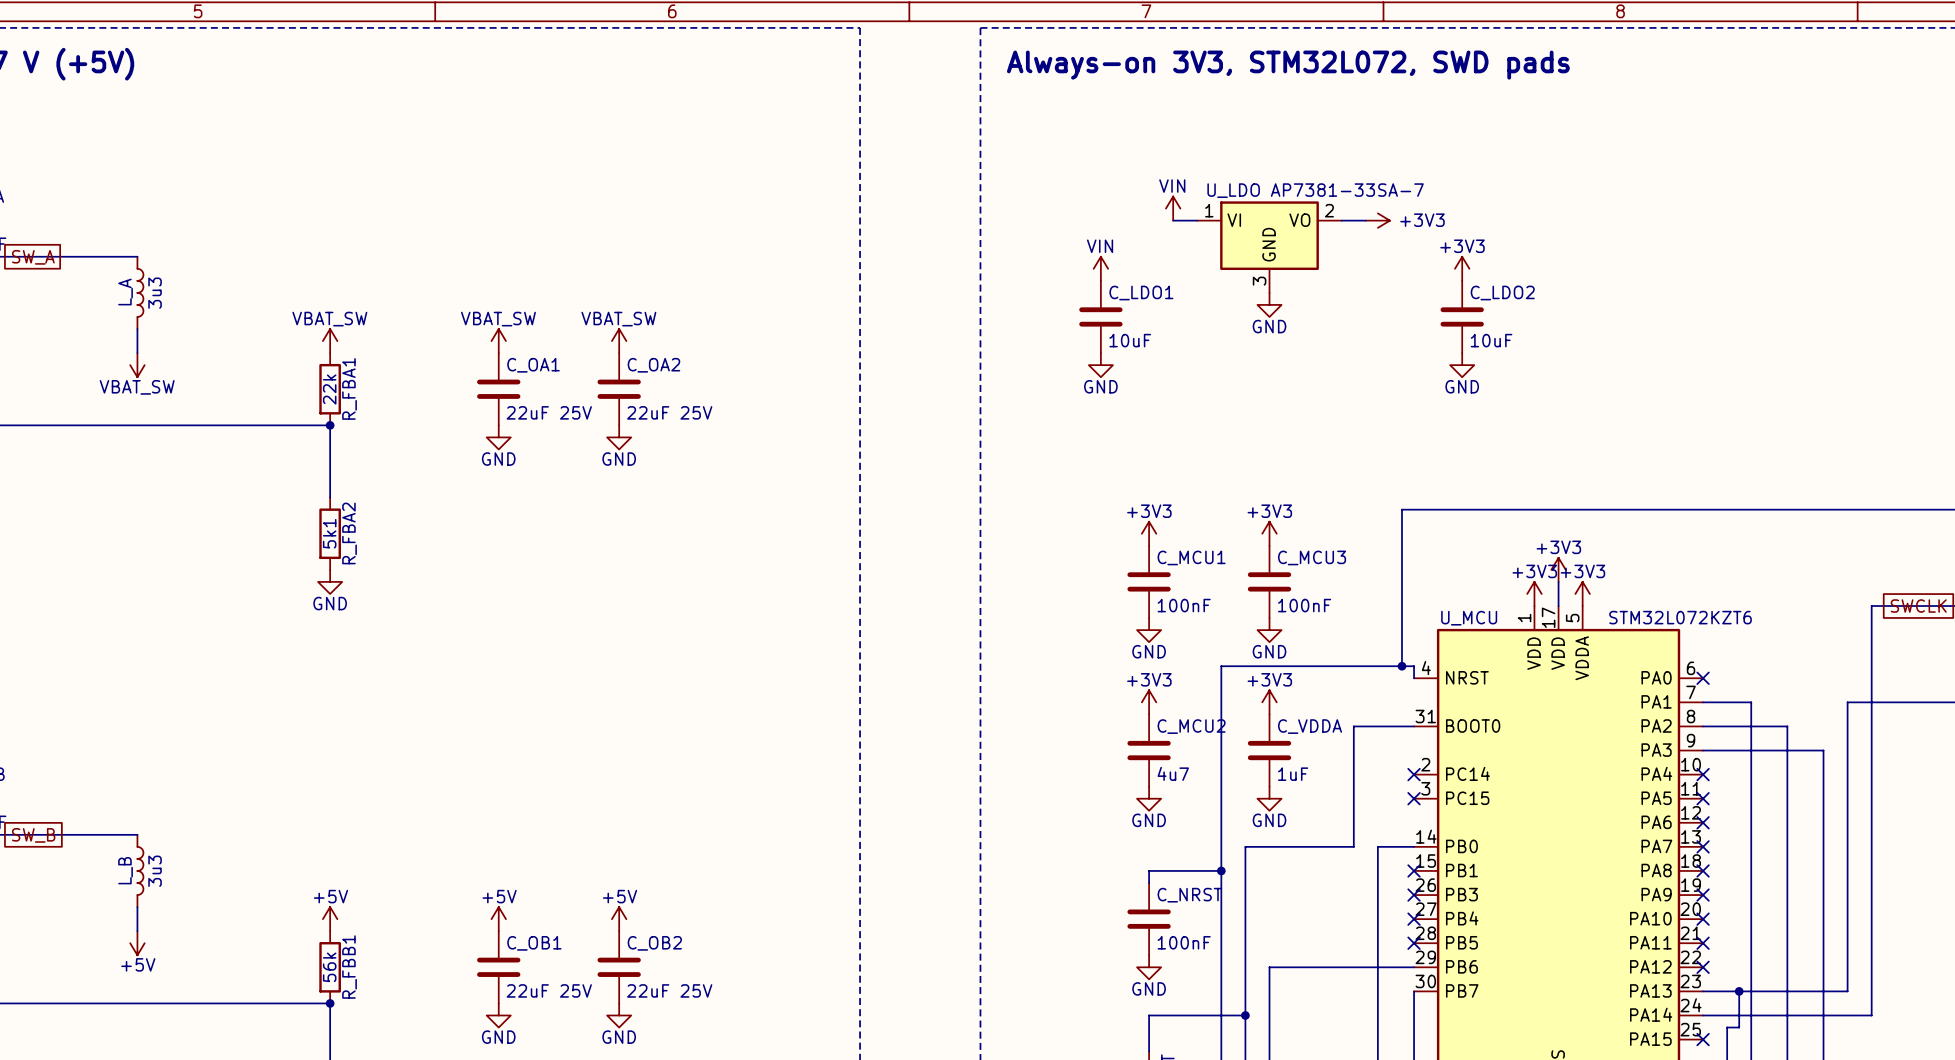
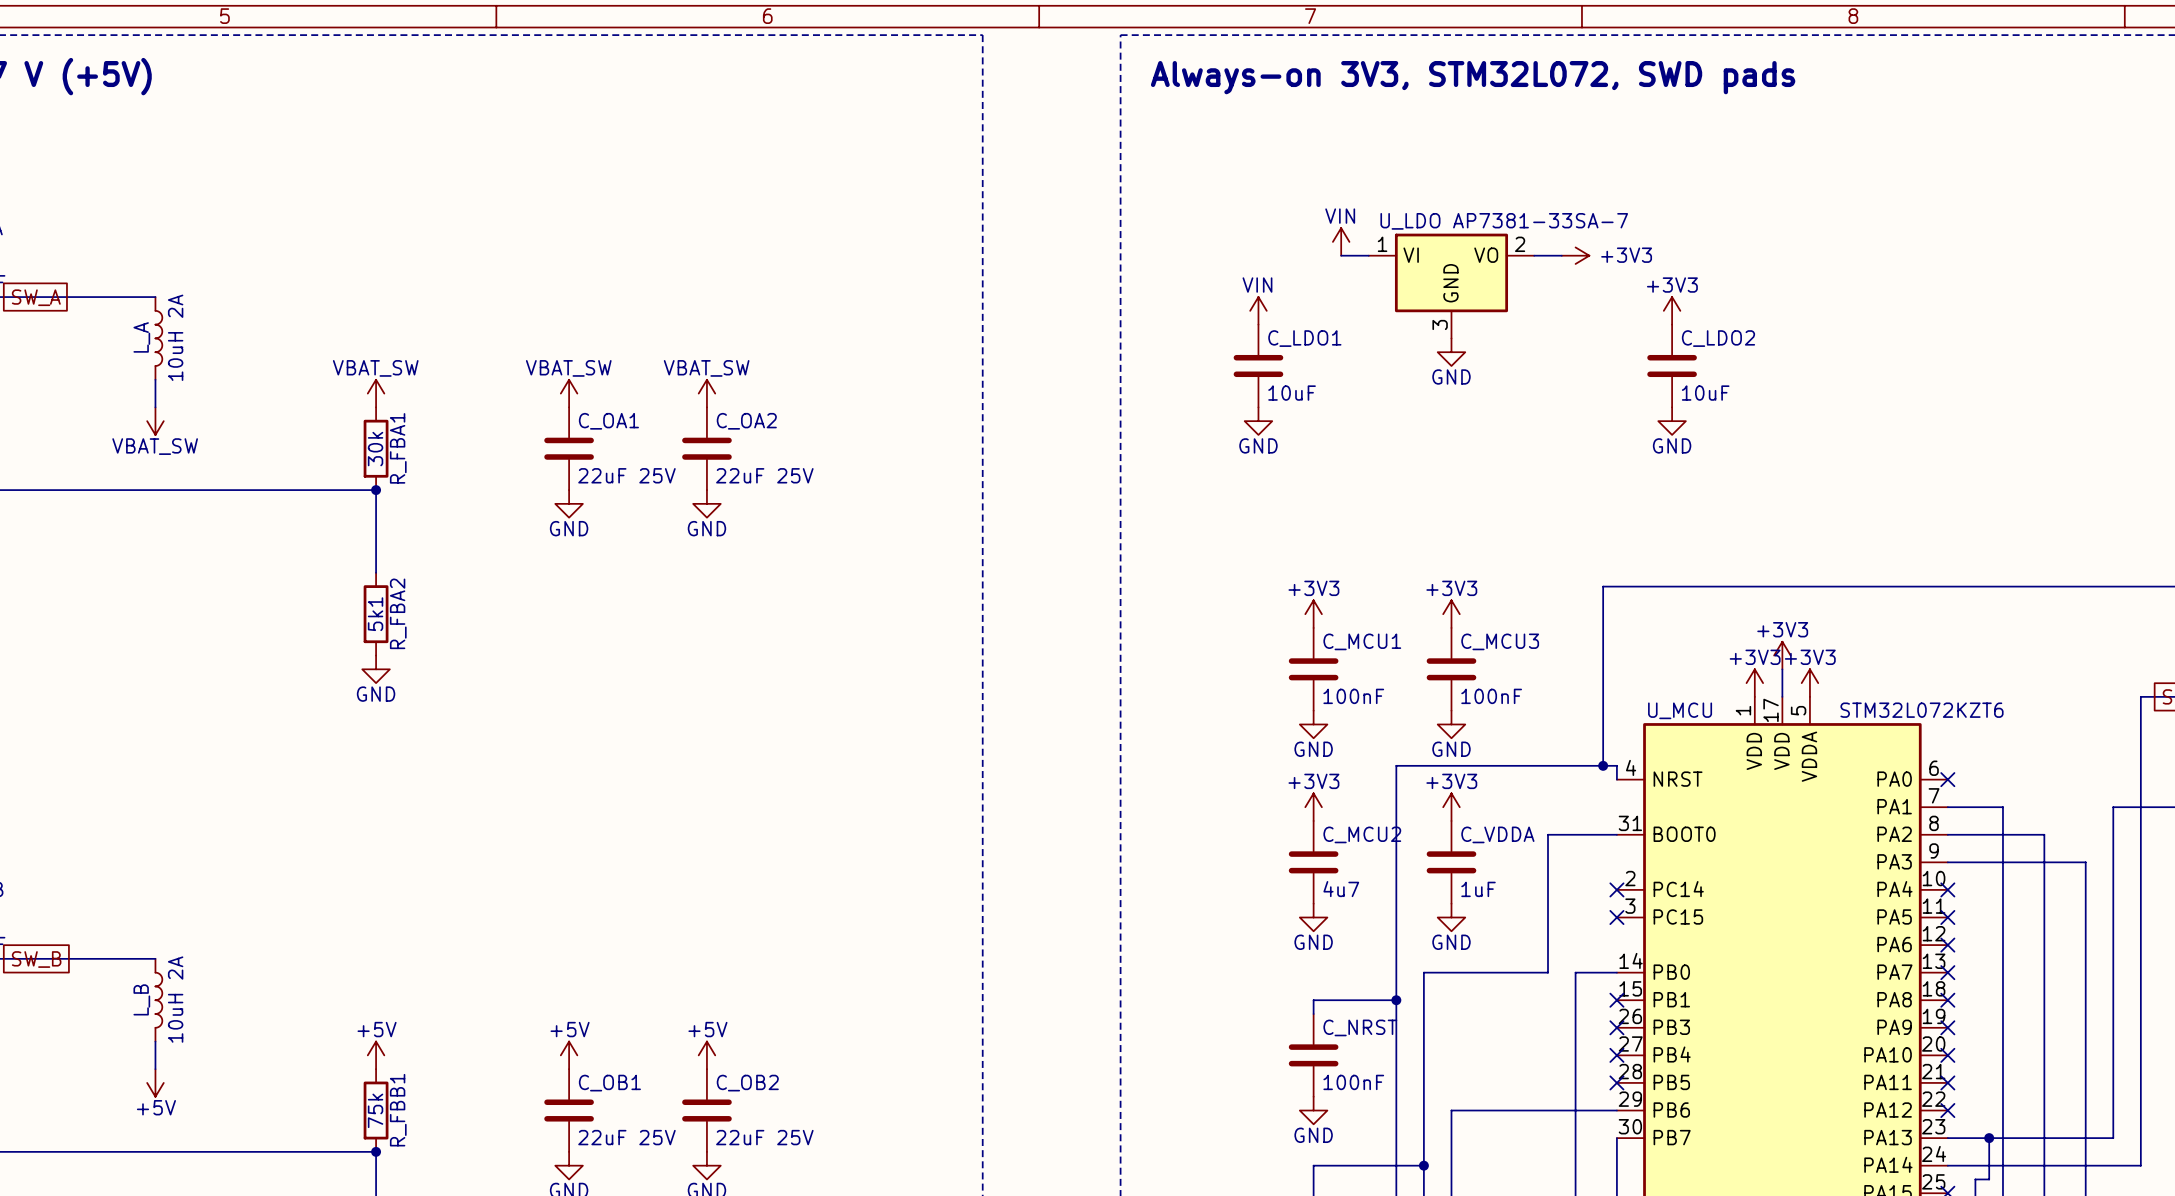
L_A value: 3u3 (155, 293) -> 10uH 2A (175, 337)
R_FBA1 value: 22k (329, 389) -> 30k (375, 449)
L_B value: 3u3 (155, 871) -> 10uH 2A (175, 999)
R_FBB1 value: 56k (329, 967) -> 75k (375, 1110)

